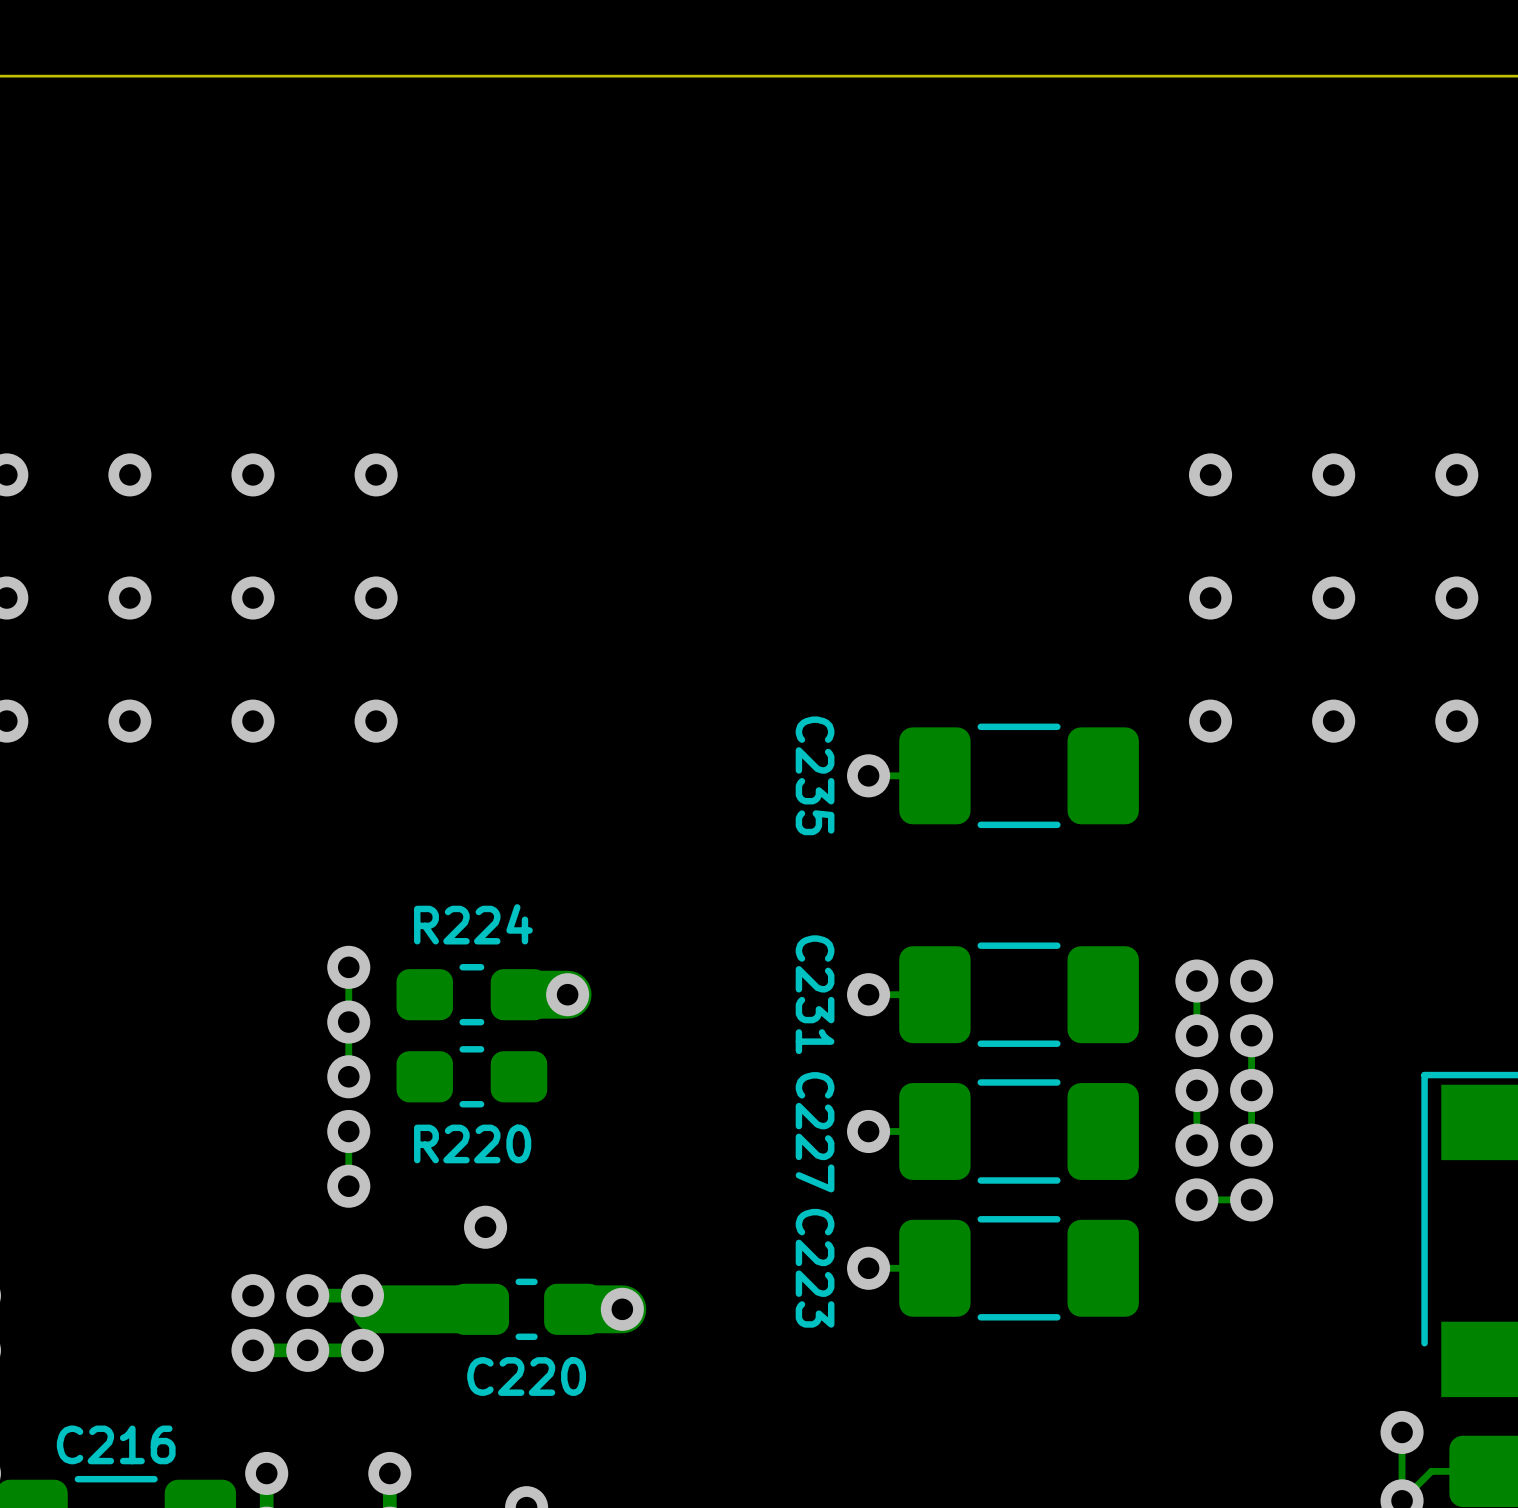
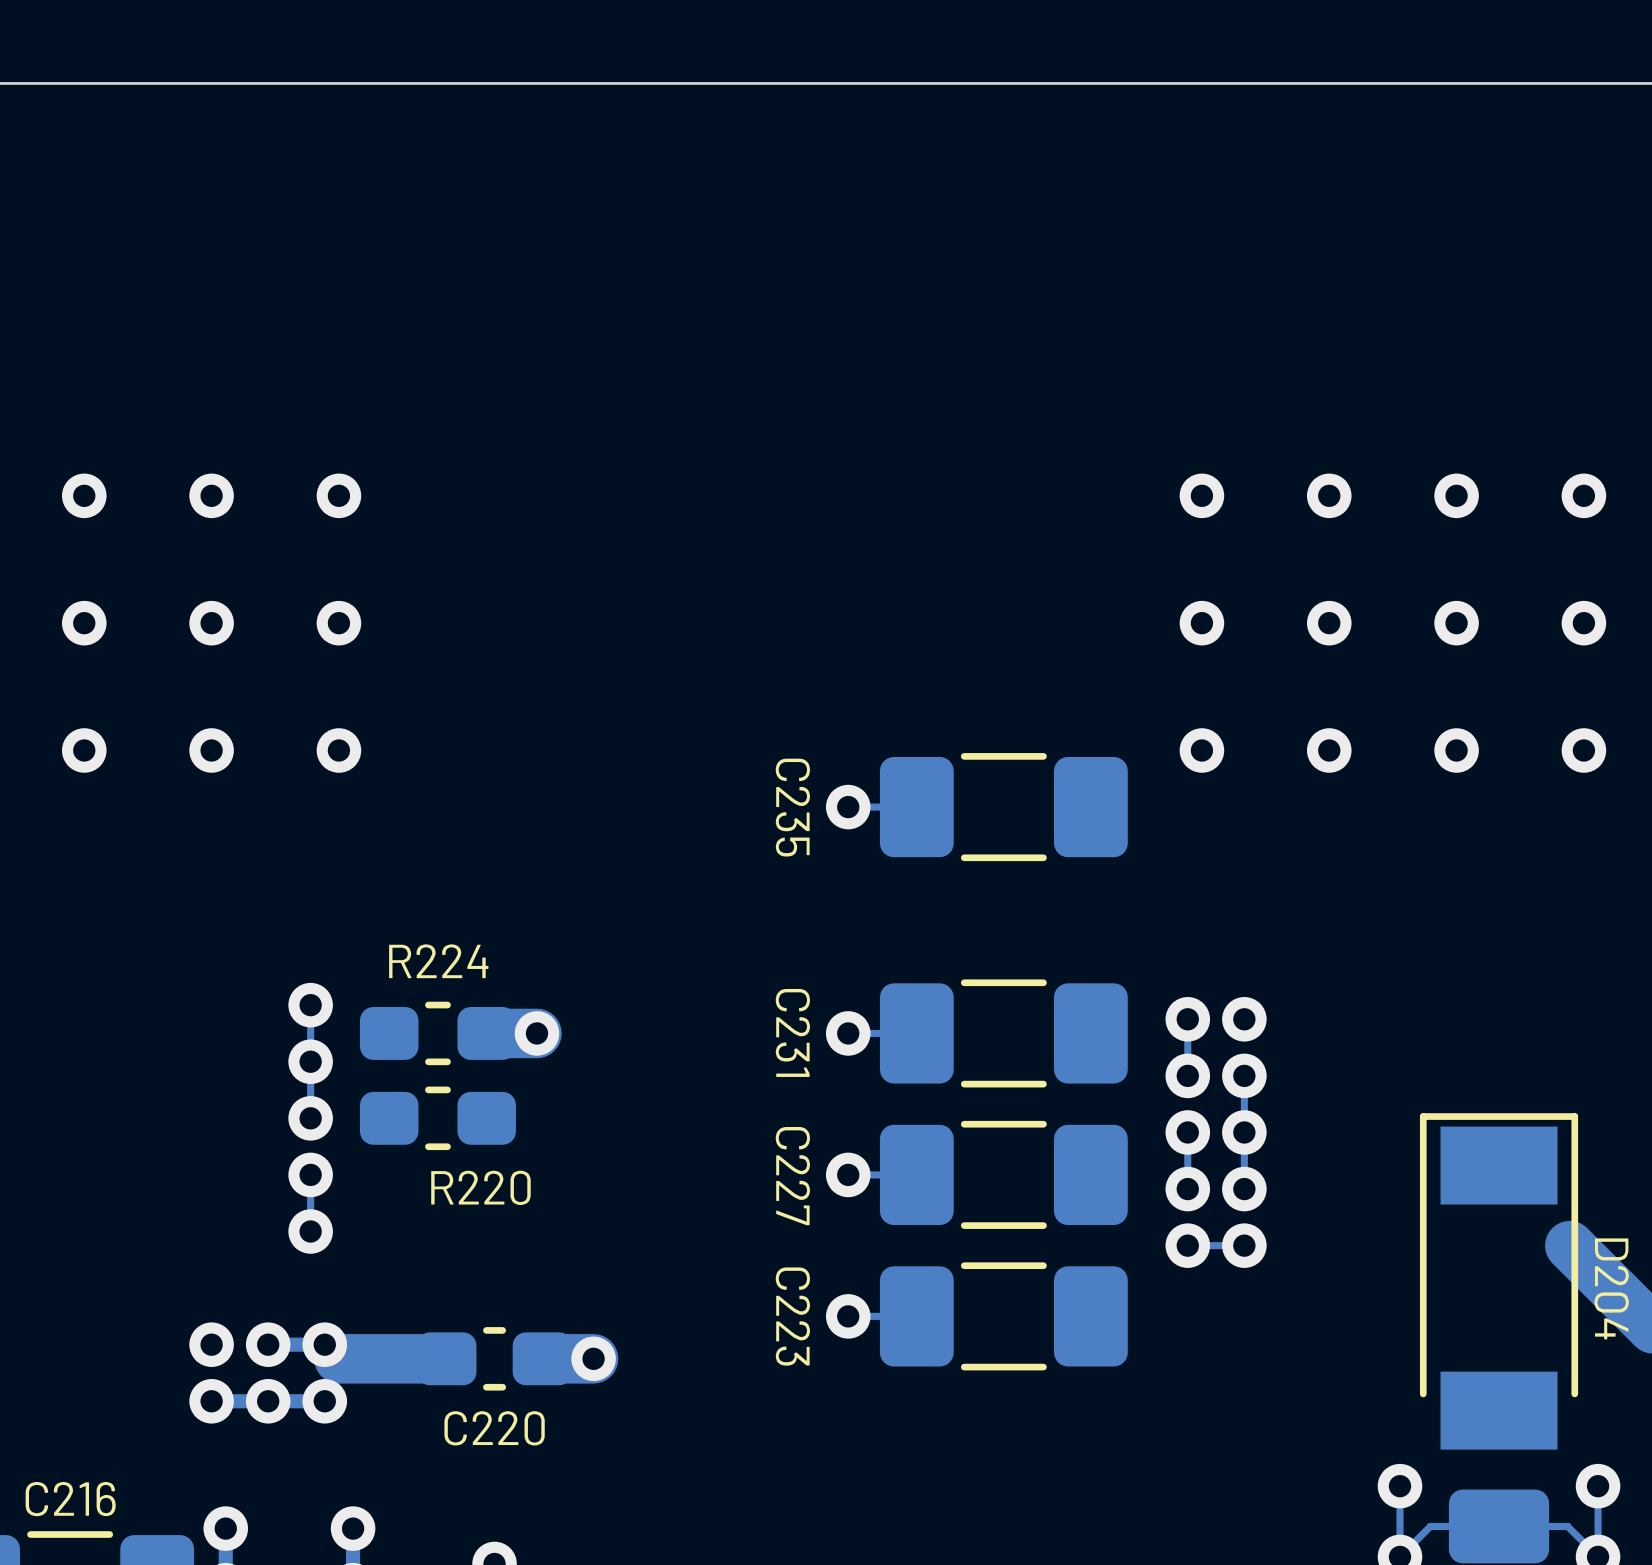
R220 name position: R220 (472, 1143) -> R220 (480, 1187)
via: (485, 1227) -> none

